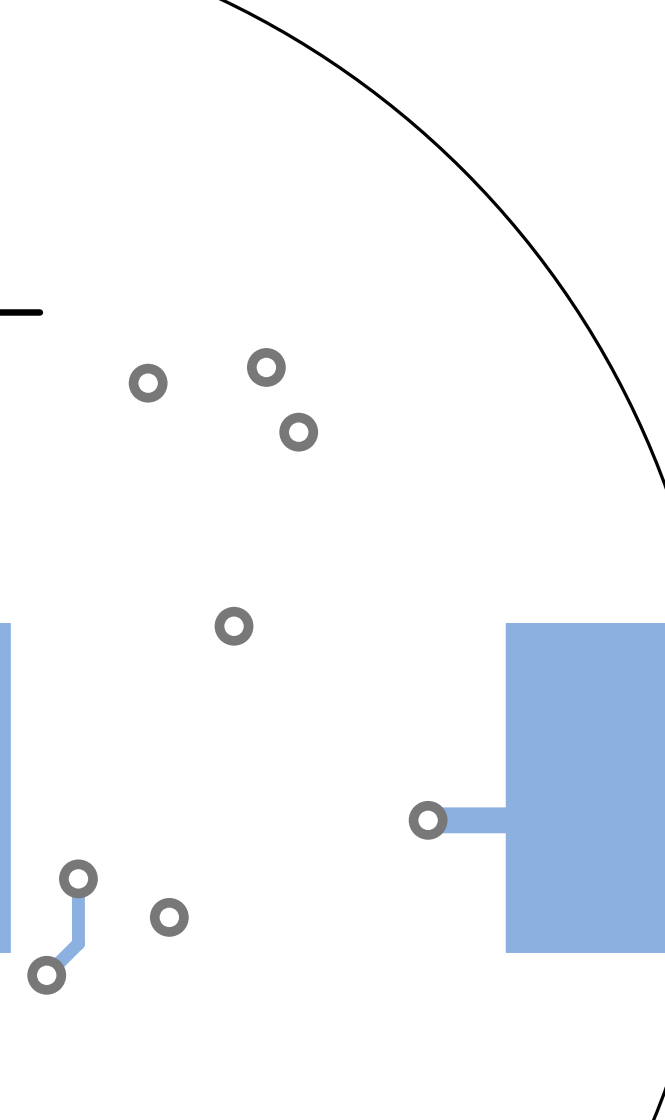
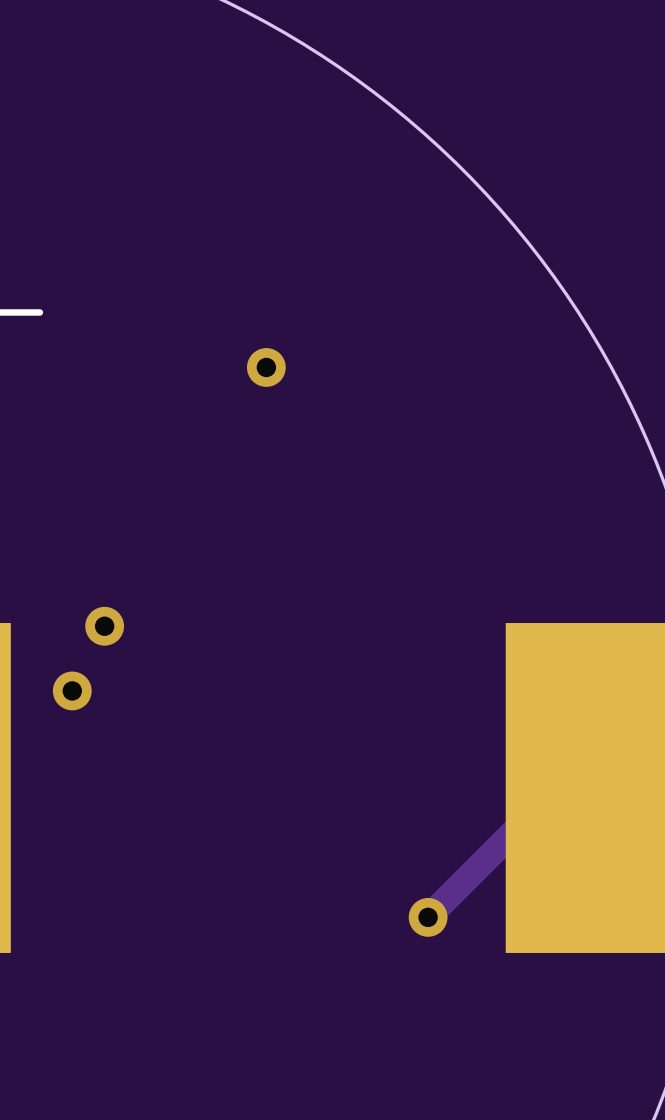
via: (148, 383) -> none
via: (298, 432) -> none
via: none -> (104, 626)
via: (234, 626) -> none
via: none -> (72, 690)
track: none -> (557, 787) (428, 917)
track: (557, 817) (554, 820) (428, 820) -> none
via position: (428, 820) -> (428, 917)
track: (78, 878) (78, 943) (46, 975) -> none
via: (78, 878) -> none
via: (169, 917) -> none
via: (46, 975) -> none

